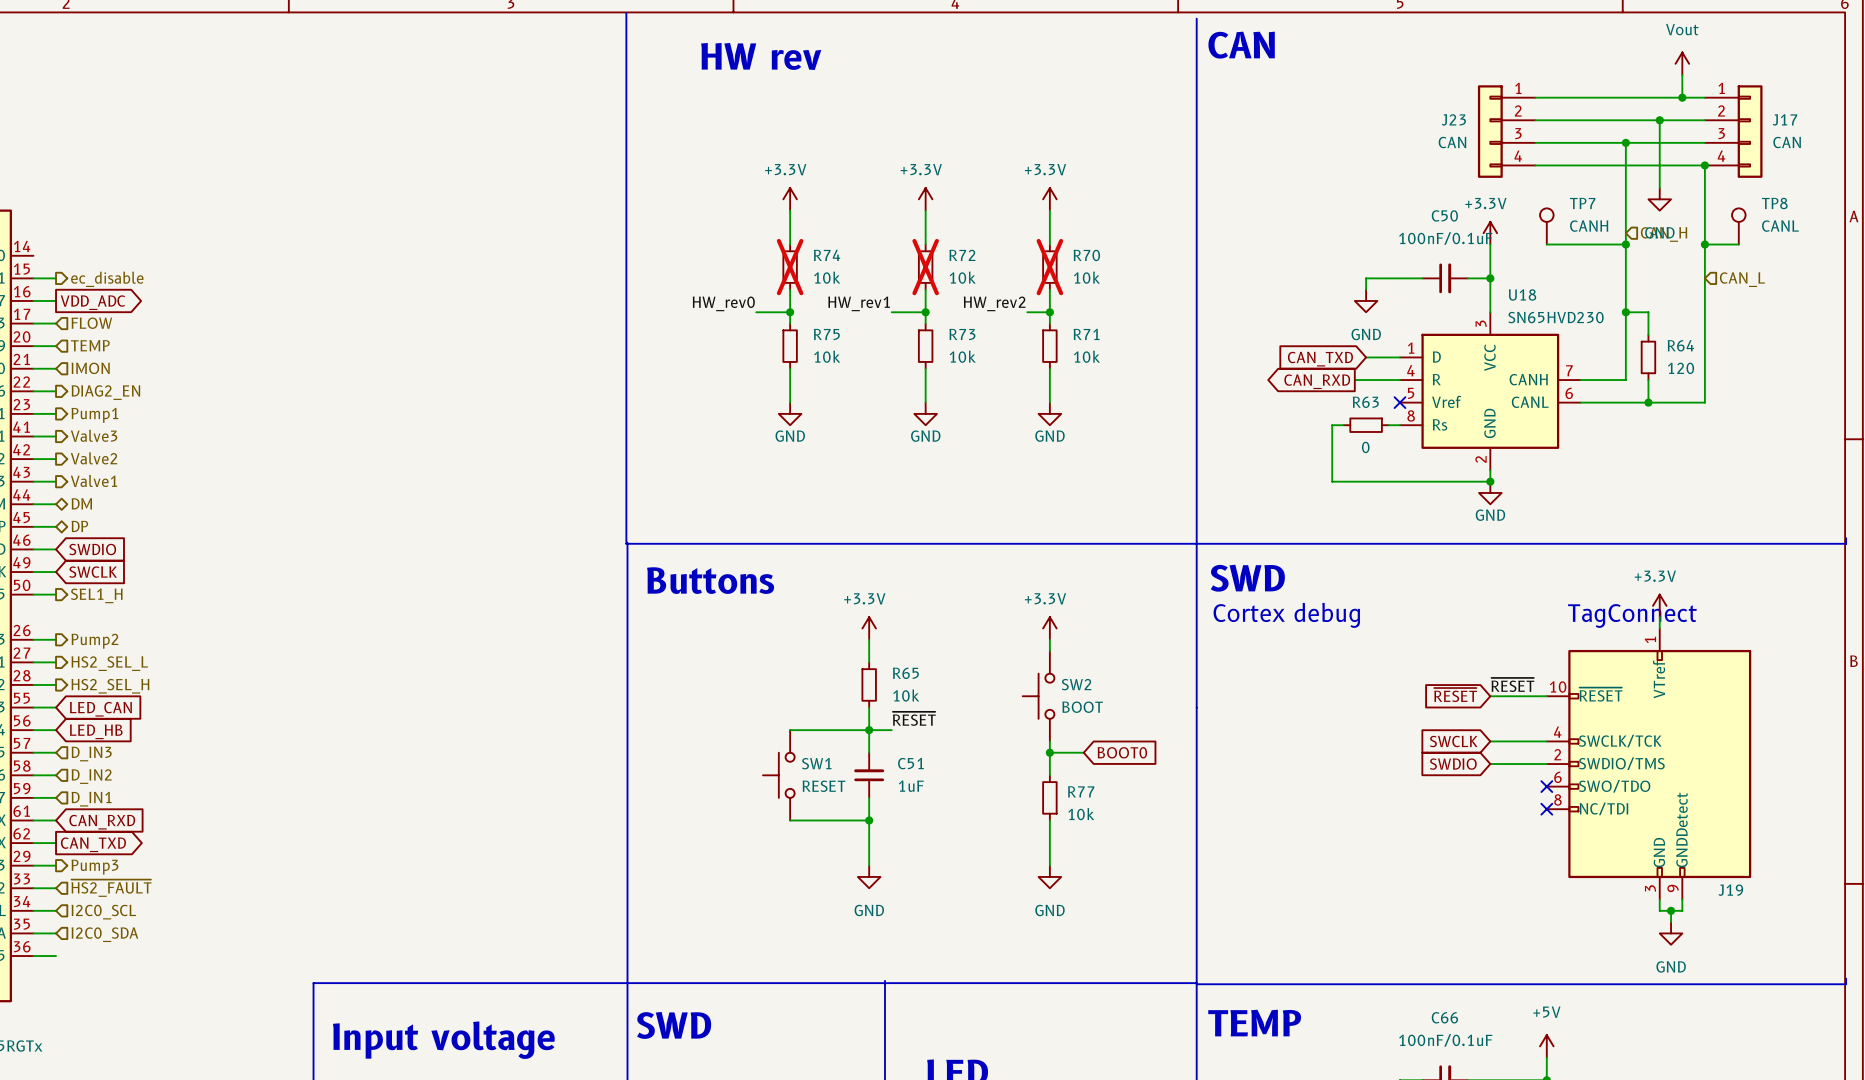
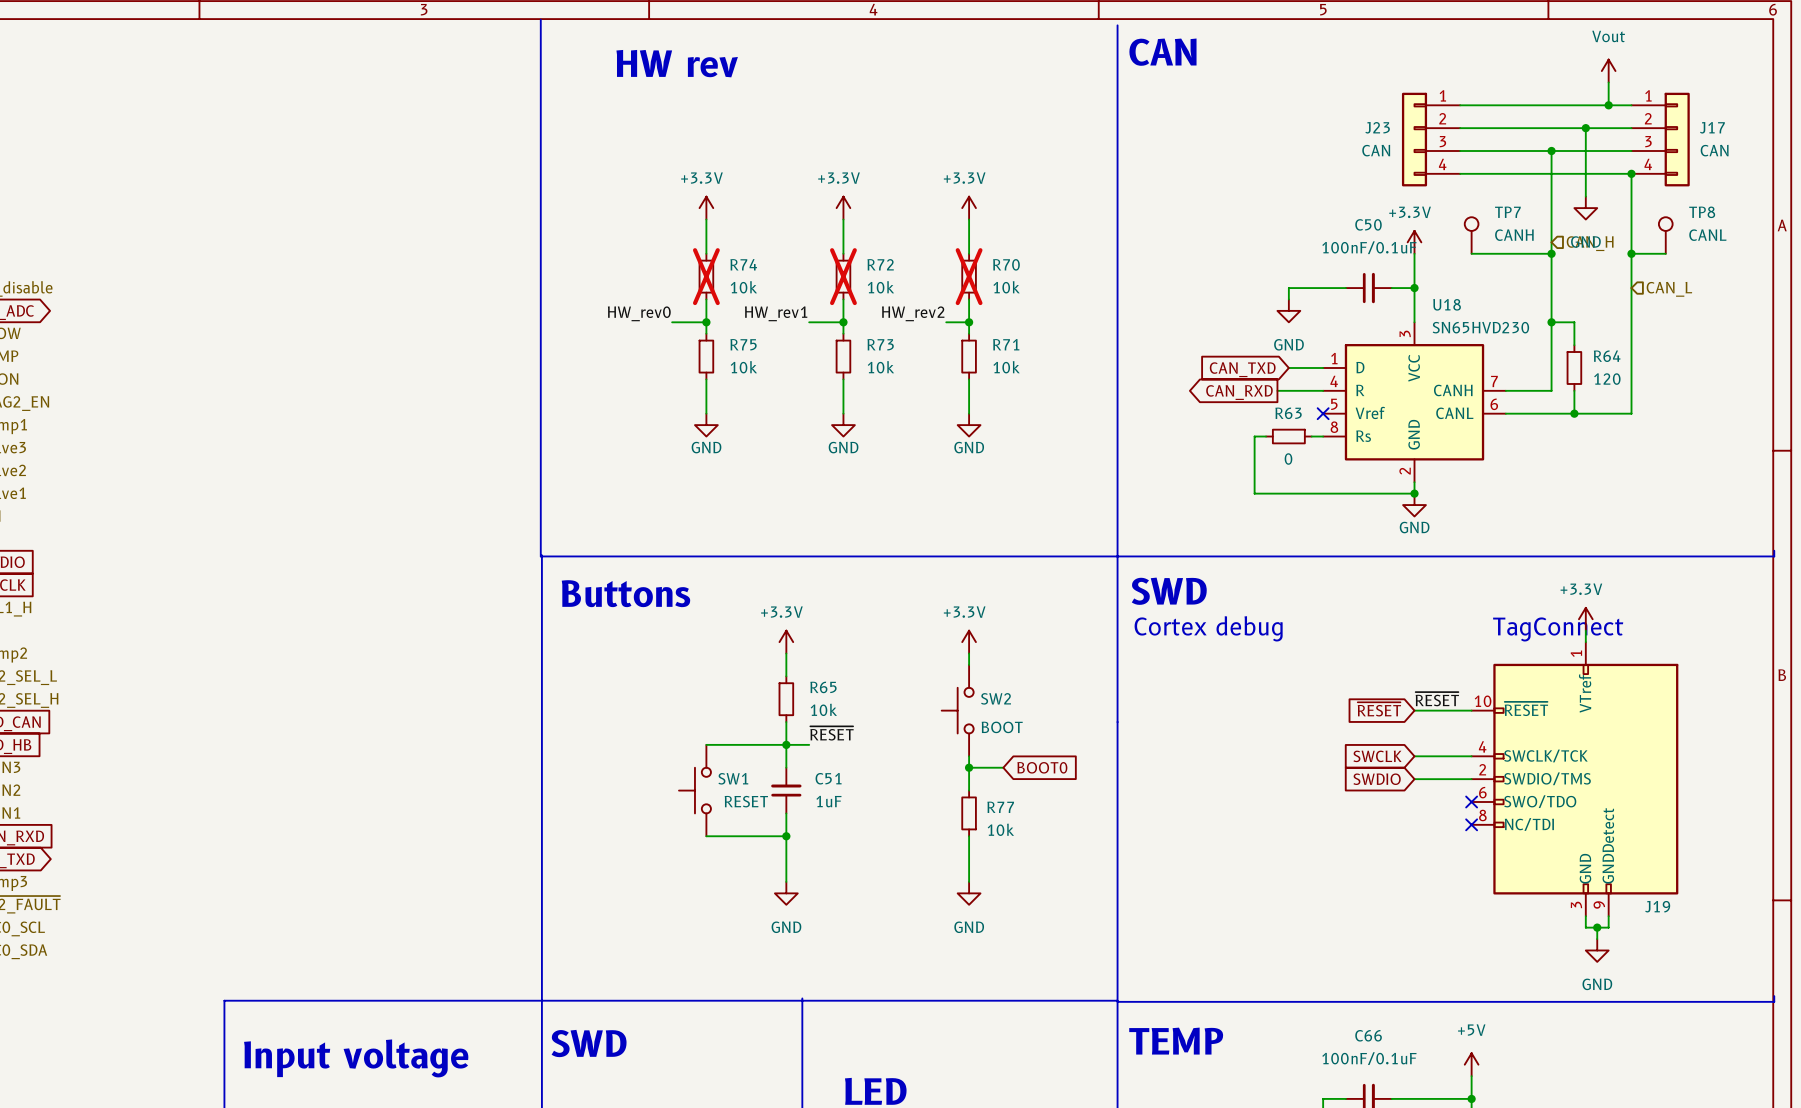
SW2 text: BOOT (1082, 707) -> none
SW2 value: none -> BOOT (1002, 727)
SW1 text: RESET (823, 786) -> none
SW1 value: none -> RESET (746, 801)

